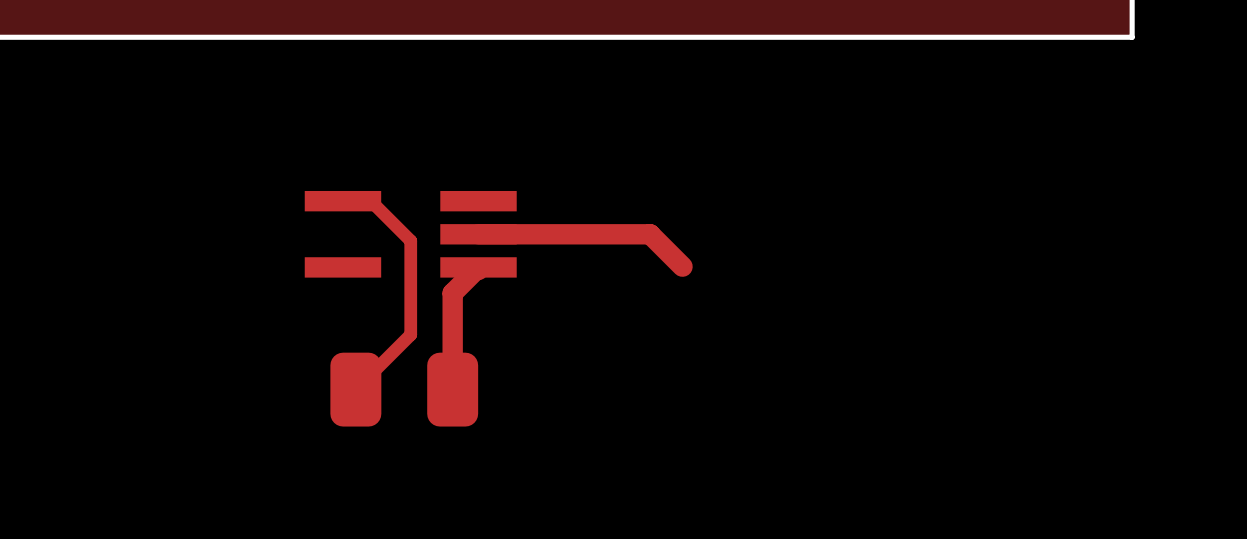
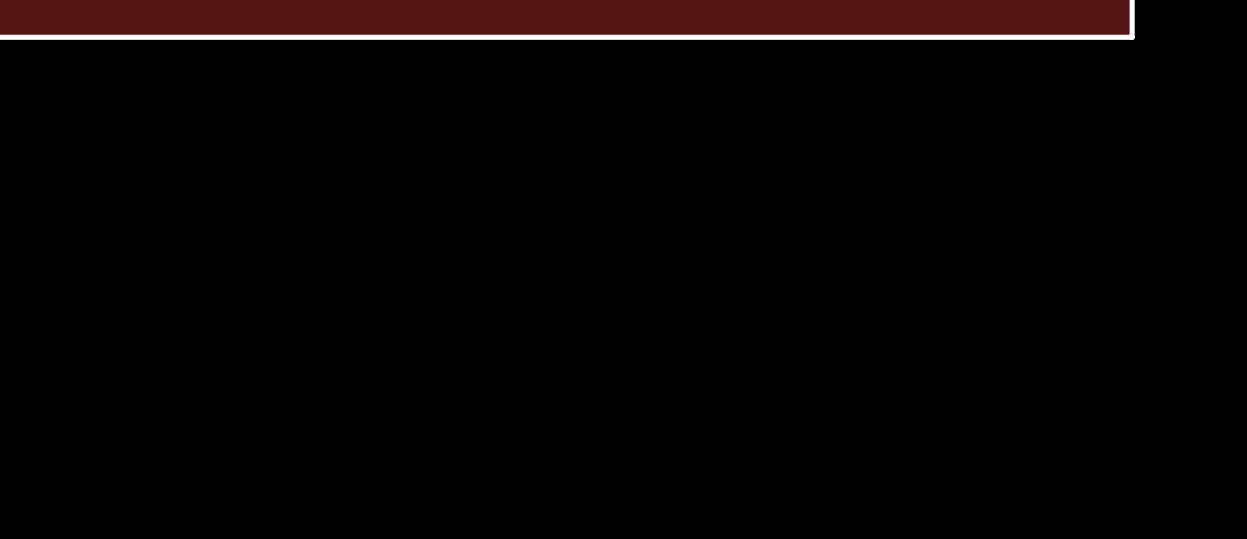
top track: (342, 201) (370, 201) (410, 240) (410, 334) (355, 389) -> none
part: (410, 234) -> none
top track: (478, 234) (650, 234) (682, 266) -> none
top track: (478, 269) (475, 269) (452, 293) (452, 389) -> none
part: (404, 389) -> none

